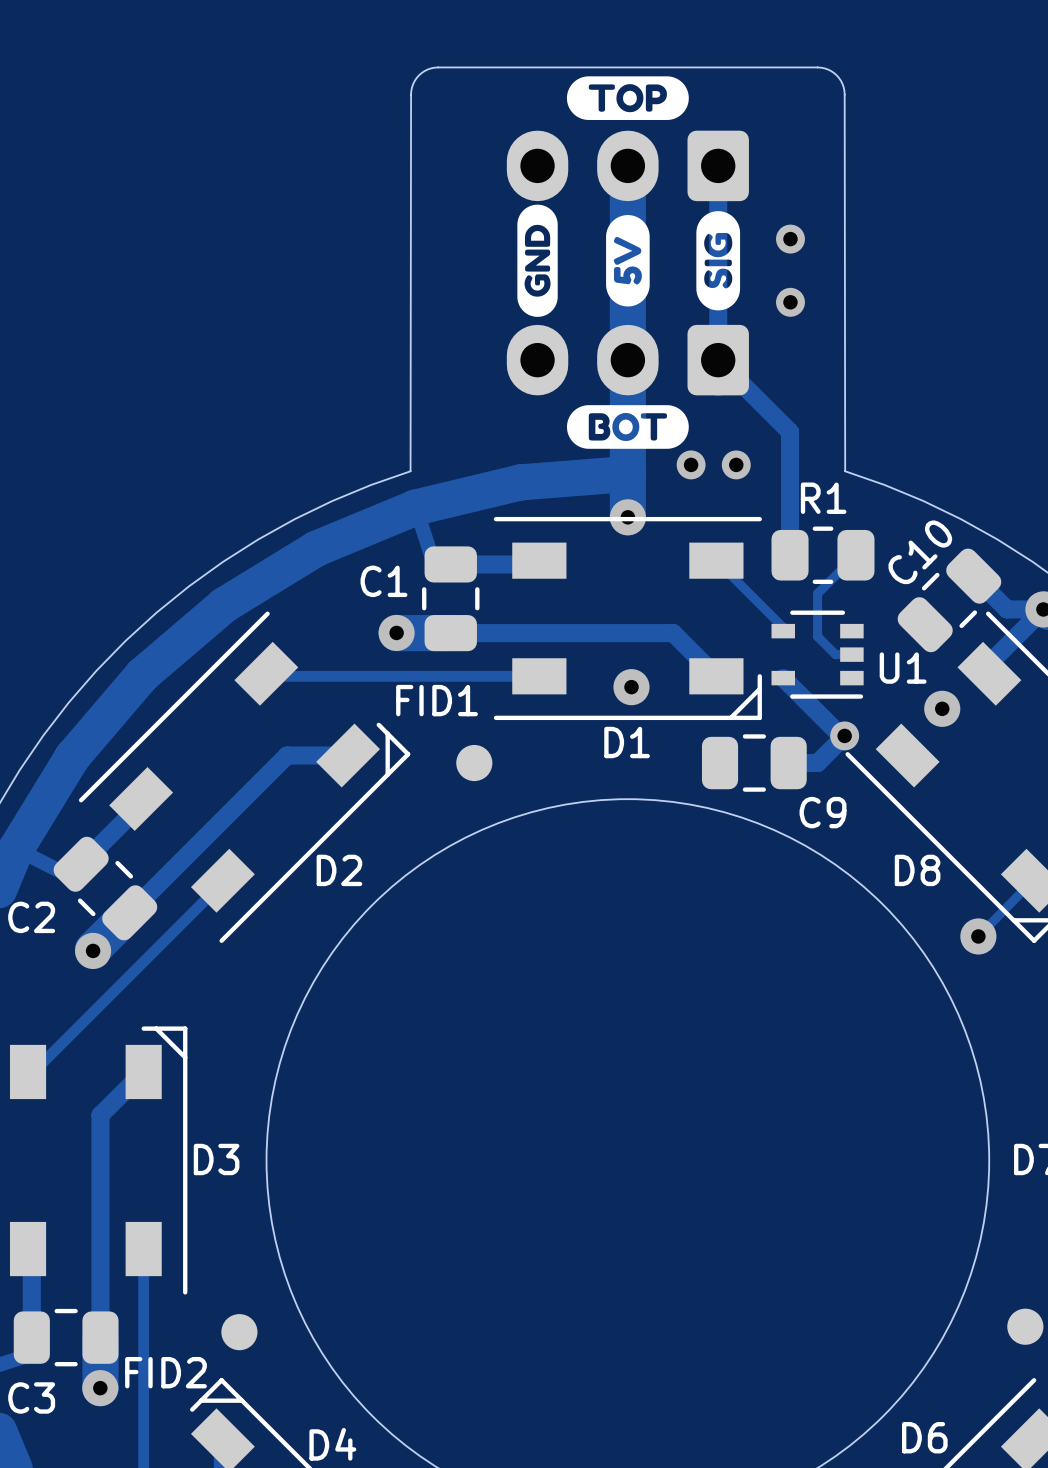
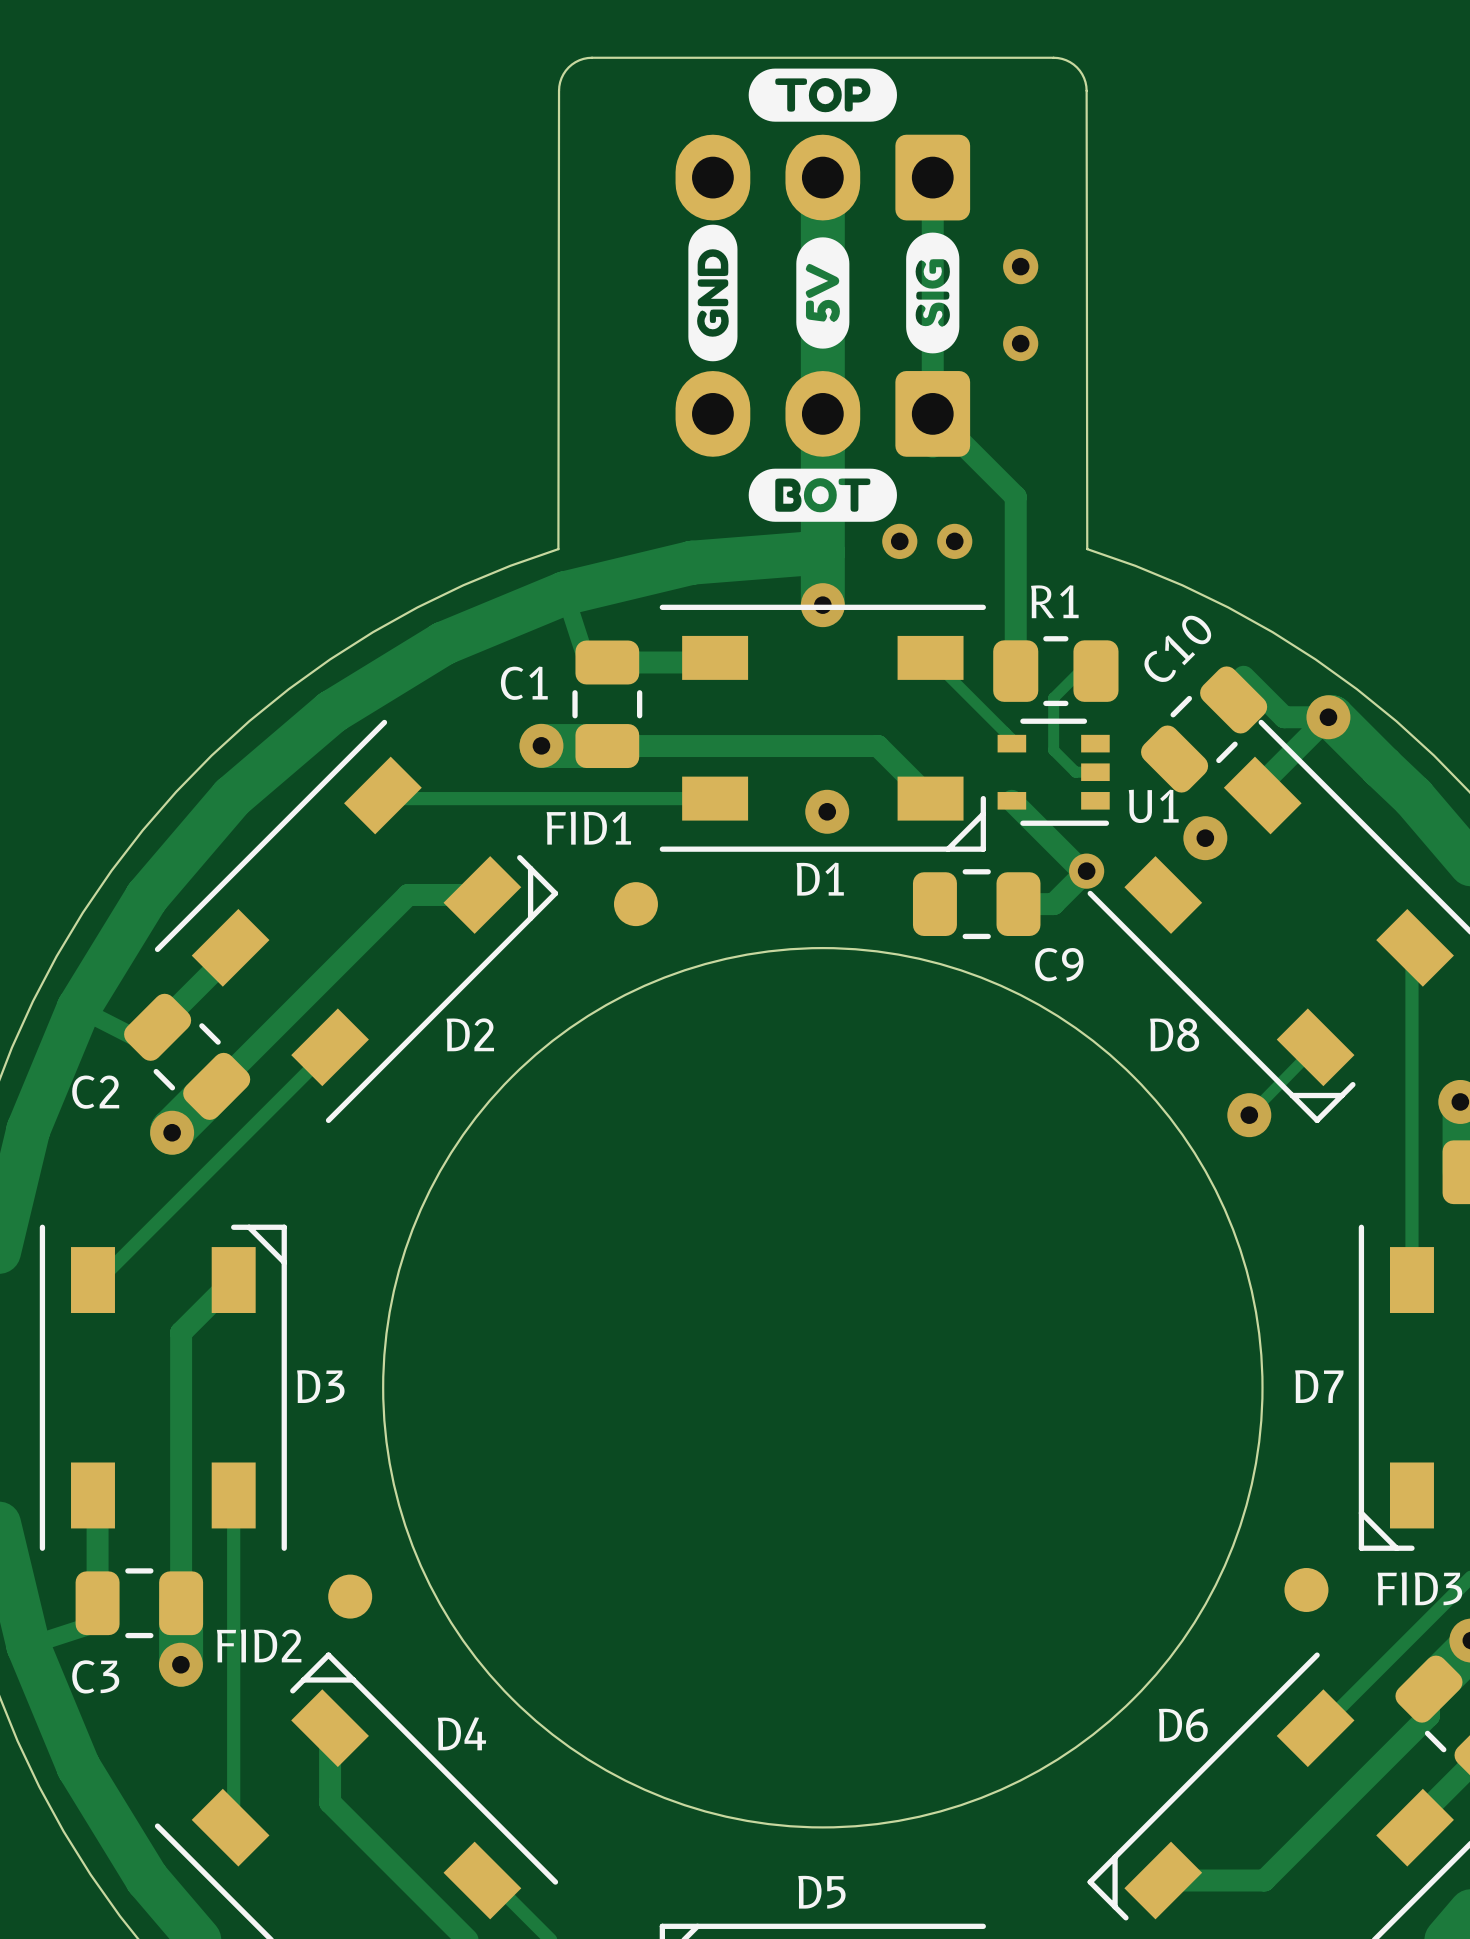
track: (786, 428) (790, 431) (790, 555) -> (1015, 496) (1015, 671)
R1 position: (823, 555) -> (1055, 671)
C10 position: (949, 600) -> (1204, 729)
U1 name position: U1 (903, 668) -> U1 (1153, 806)

